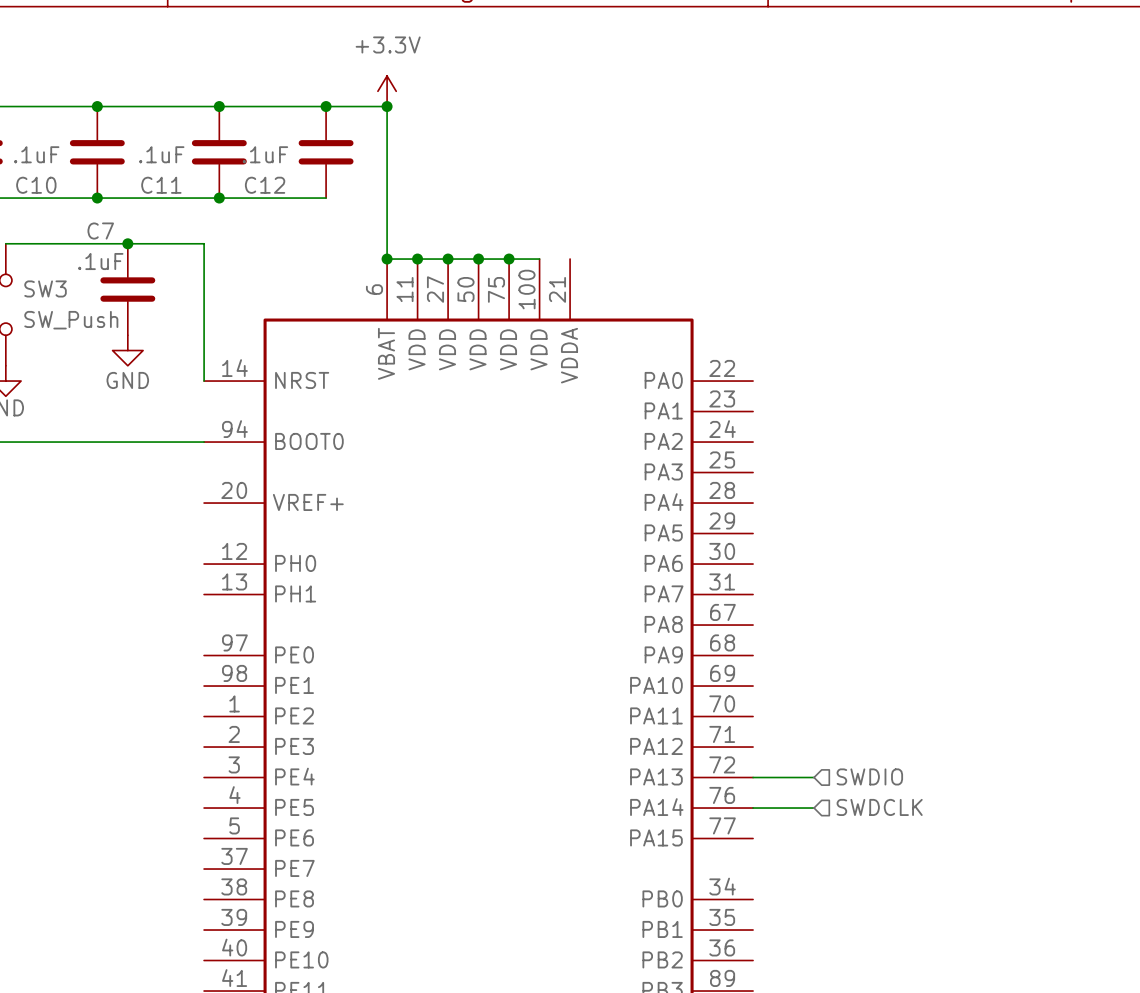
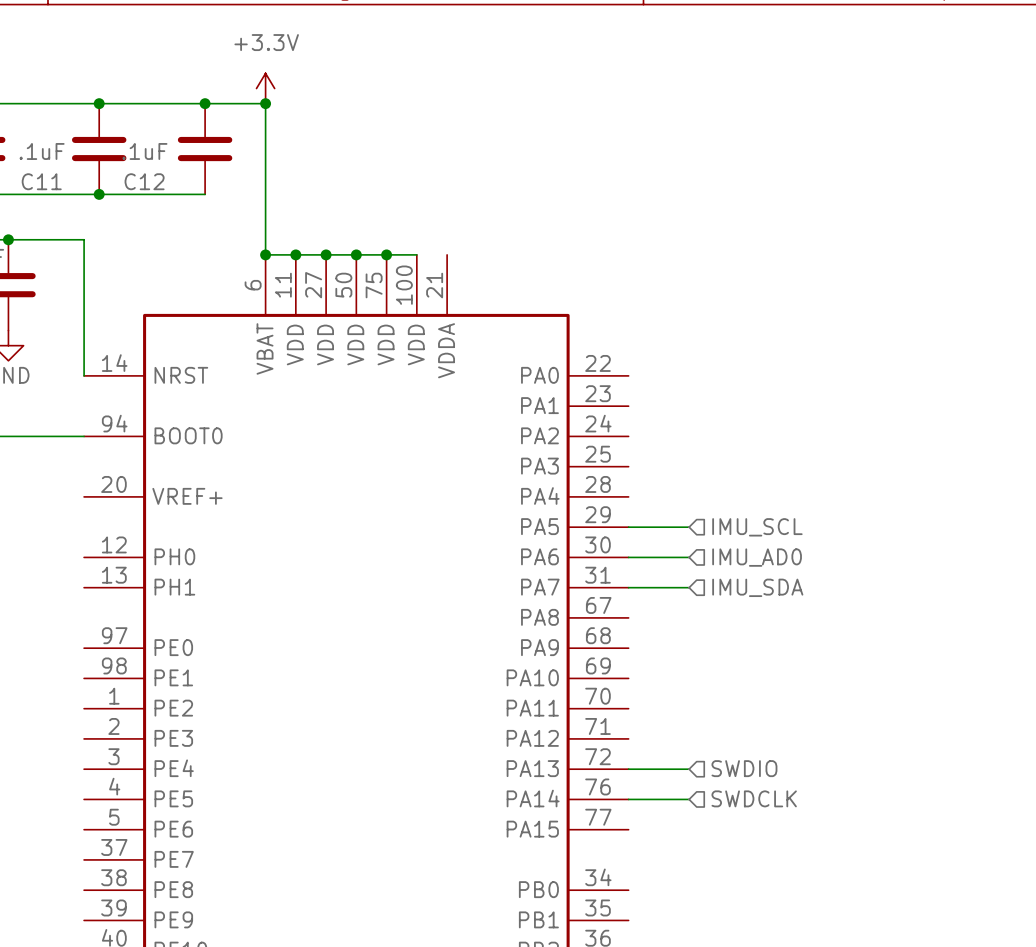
wire: none -> (628, 527) (689, 527)
hierarchical label: none -> IMU_SCL (757, 527)
wire: none -> (628, 557) (689, 557)
hierarchical label: none -> IMU_AD0 (757, 557)
wire: none -> (628, 587) (689, 587)
hierarchical label: none -> IMU_SDA (757, 587)

